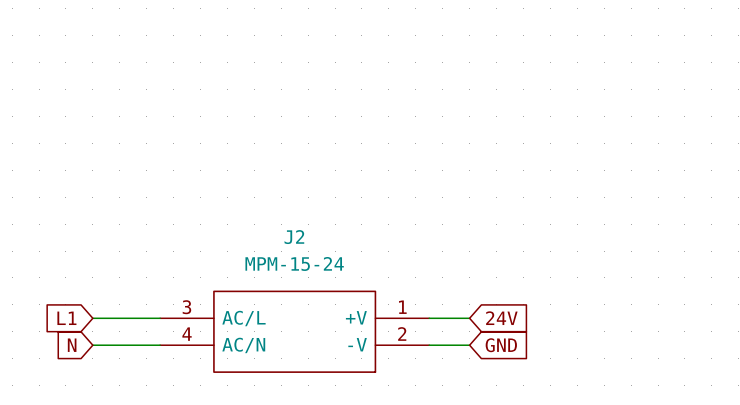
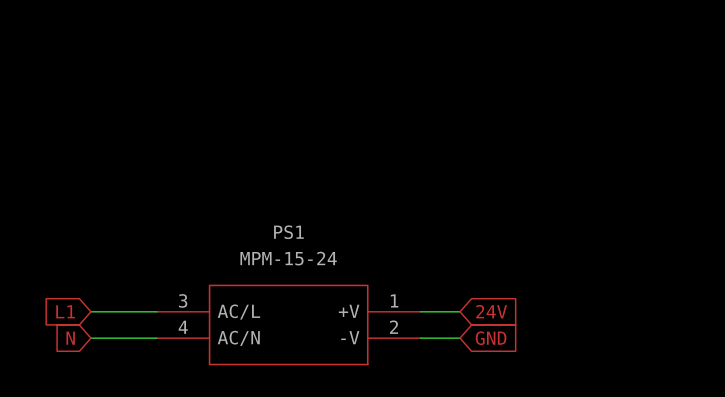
J2 name: J2 (294, 237) -> PS1 (288, 232)

